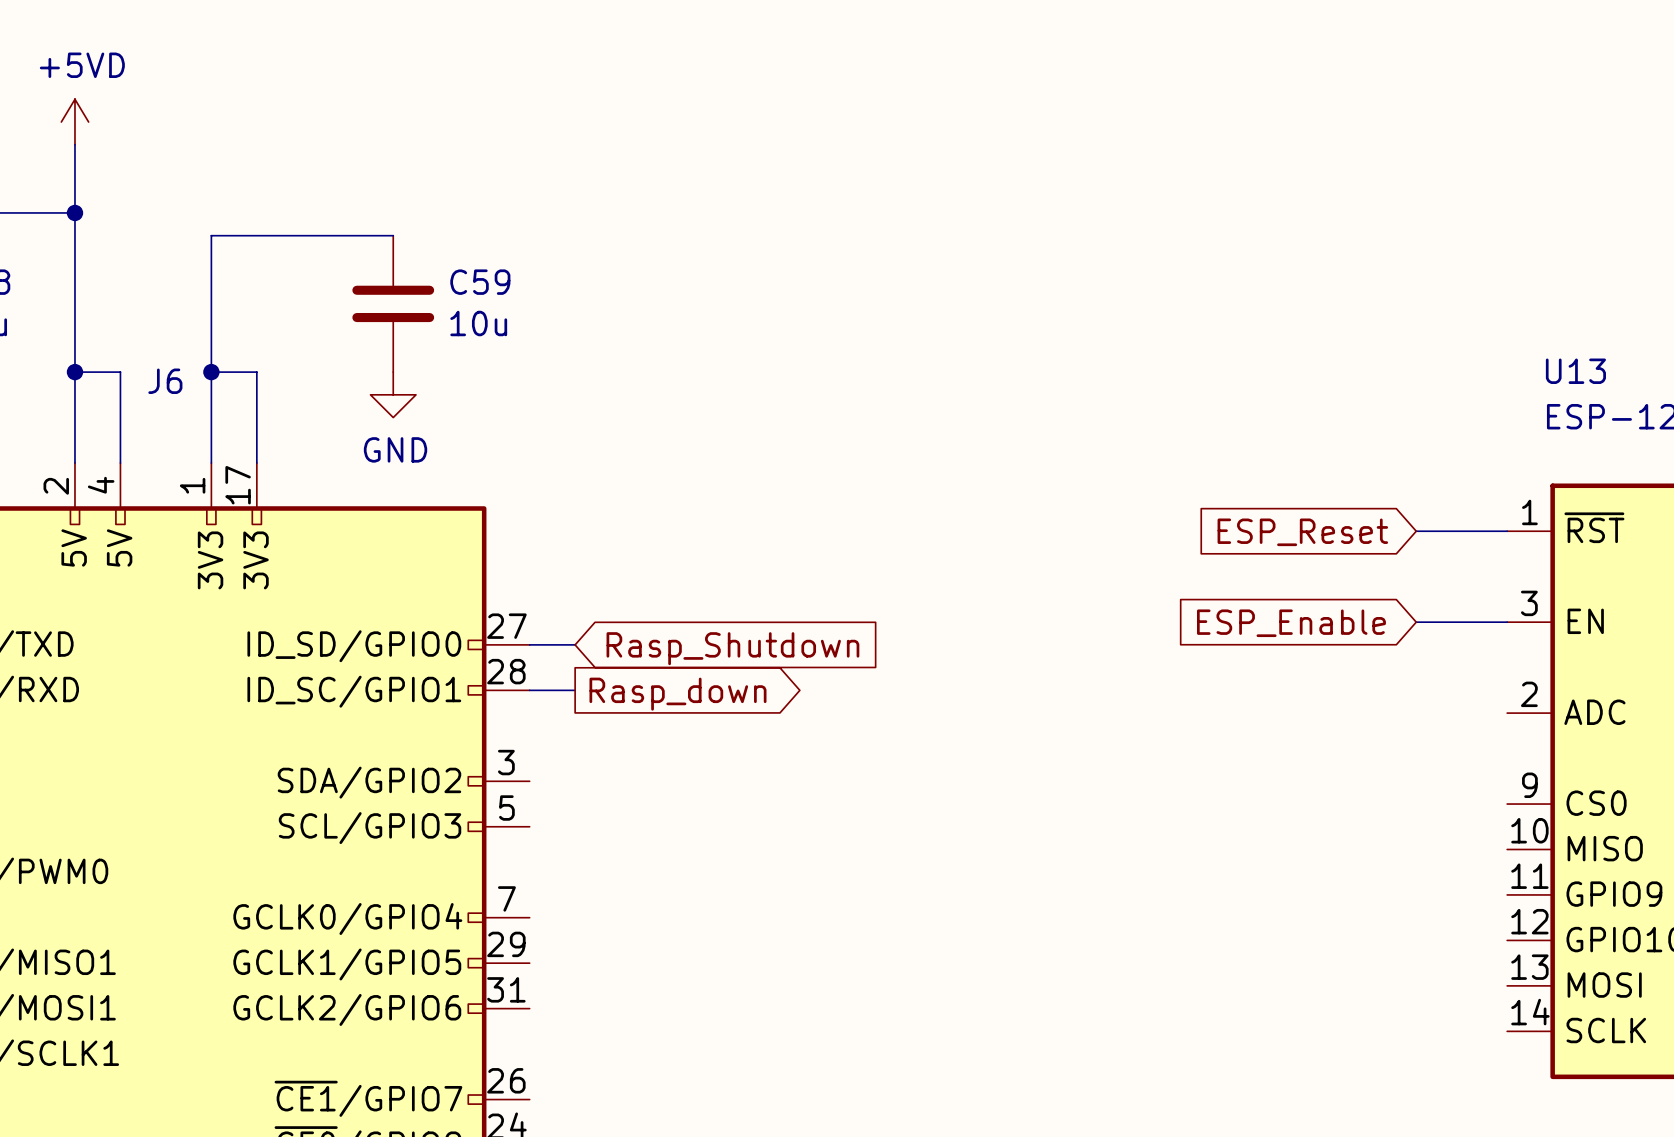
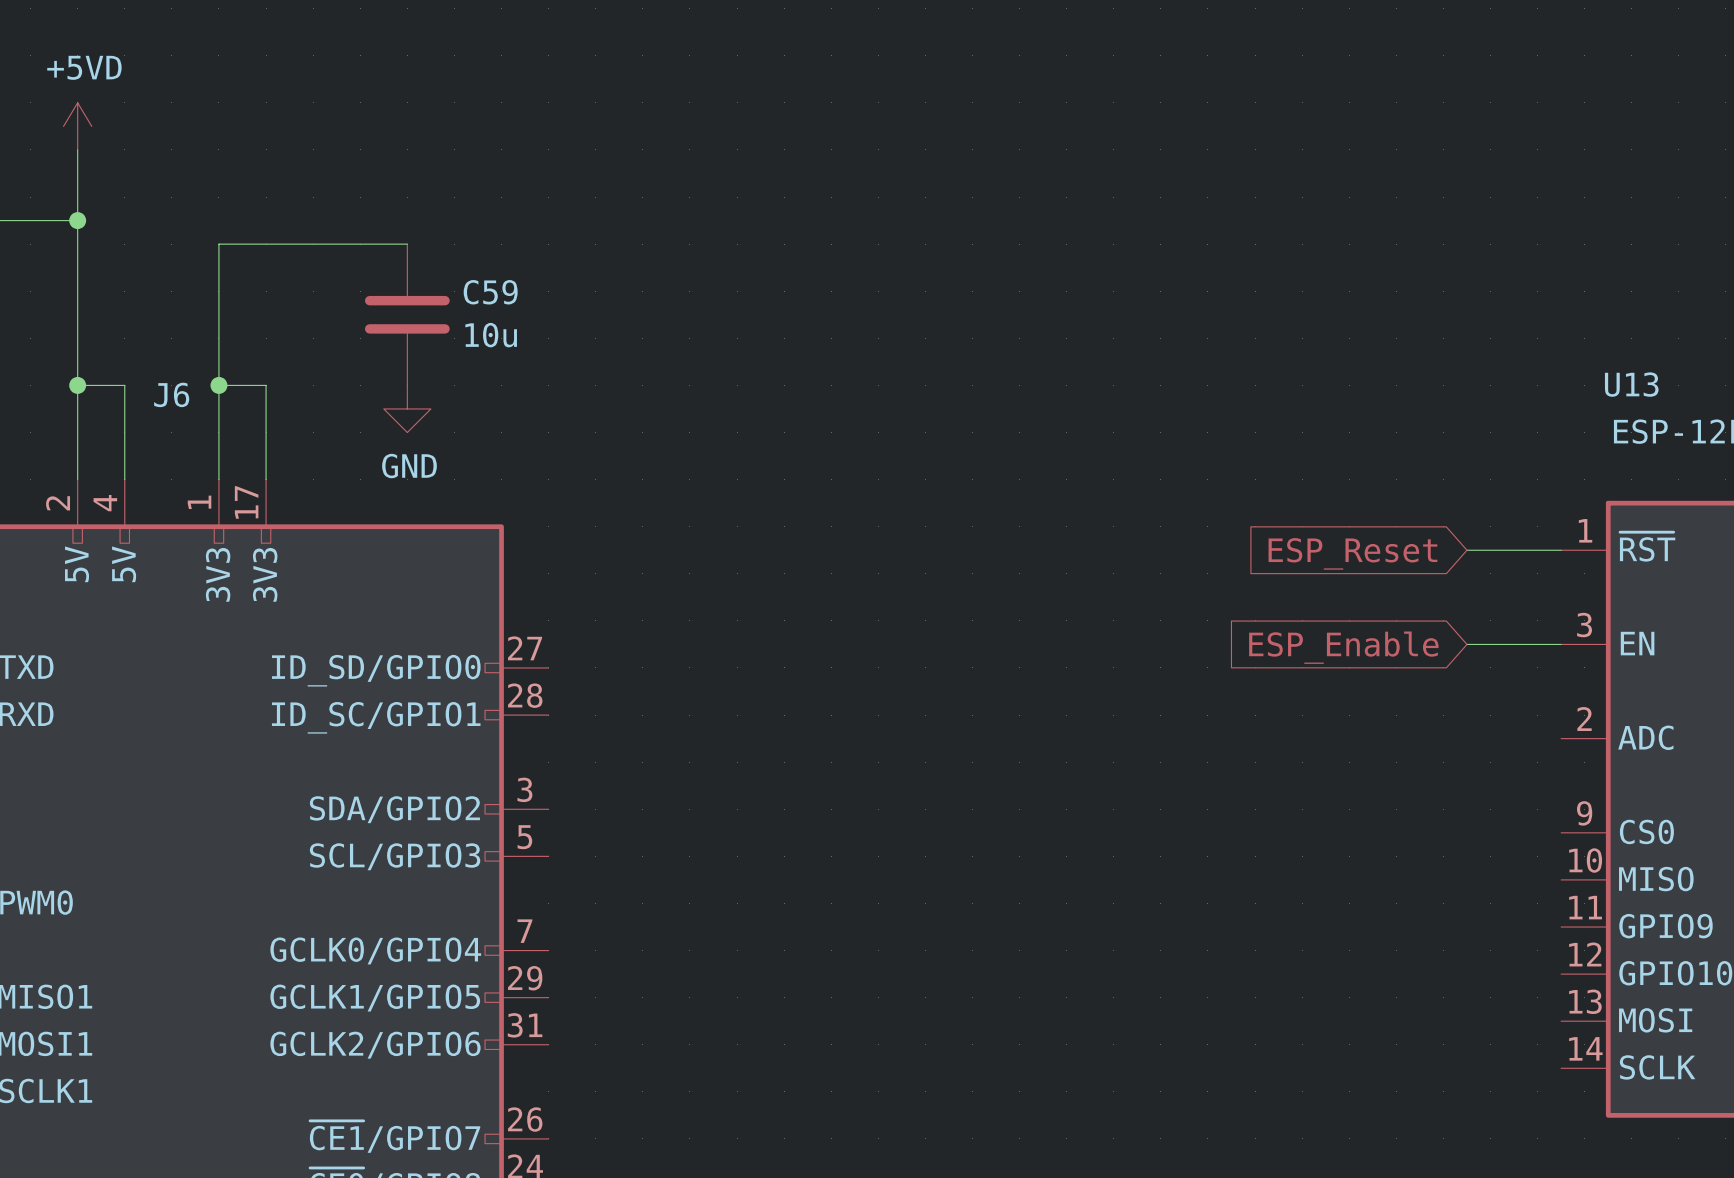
wire: (529, 644) (575, 644) -> none
global label: Rasp_Shutdown (732, 648) -> none
wire: (529, 690) (575, 690) -> none
global label: Rasp_down (677, 694) -> none

